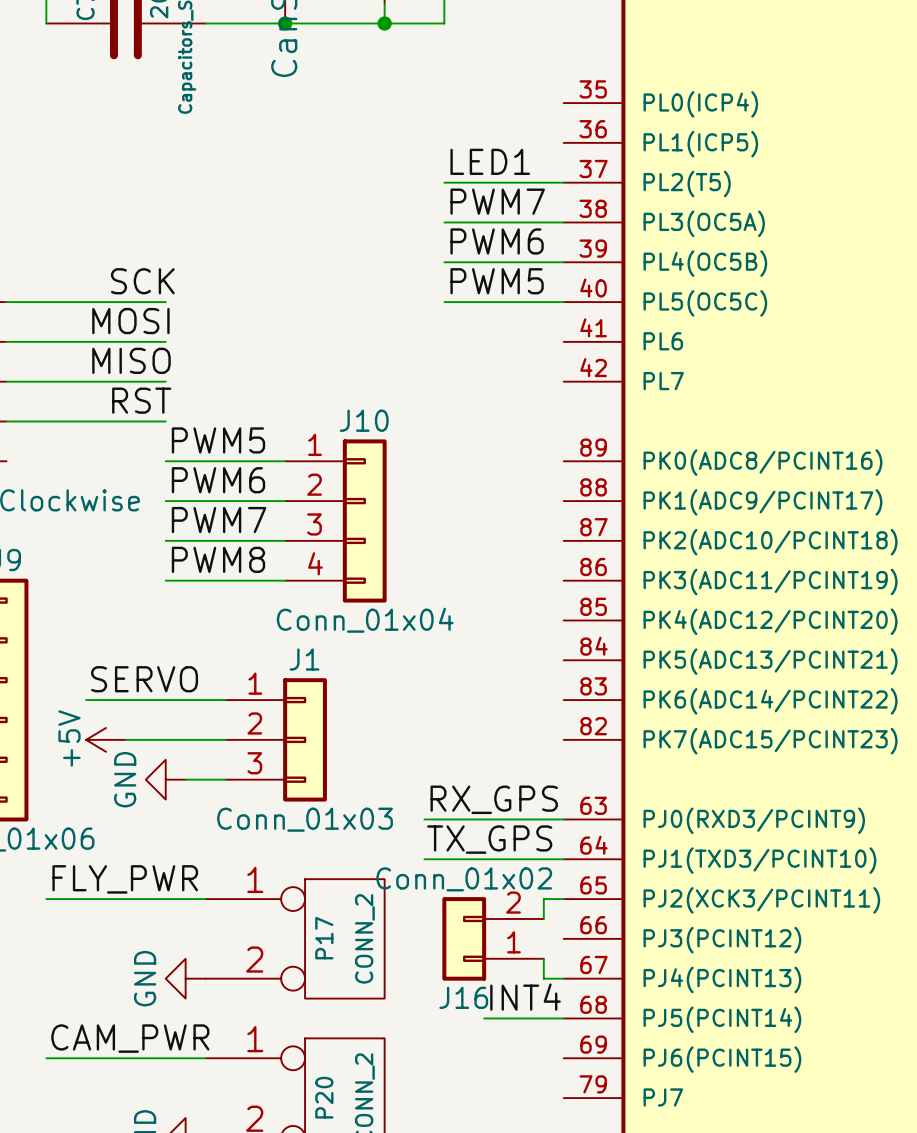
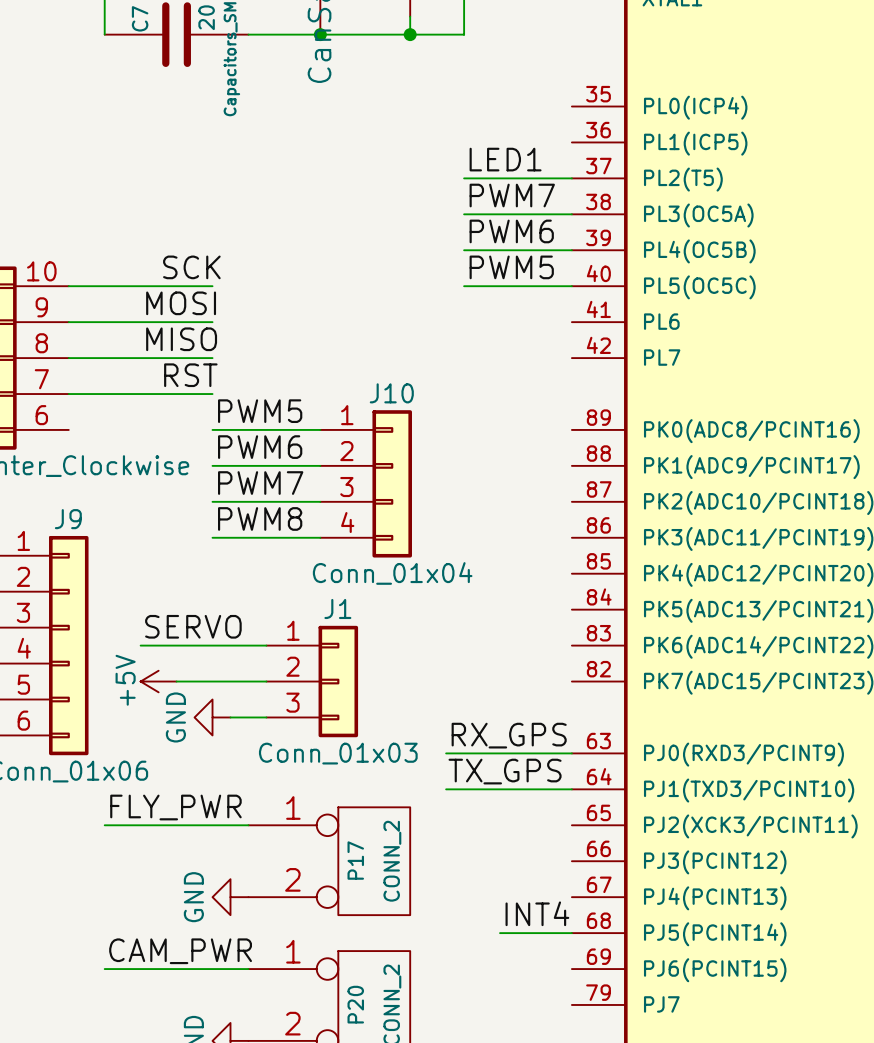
wire: (563, 899) (543, 899) (543, 918) -> none
J16: Conn_01x02 (493, 938) -> none
wire: (543, 958) (543, 978) (563, 978) -> none

